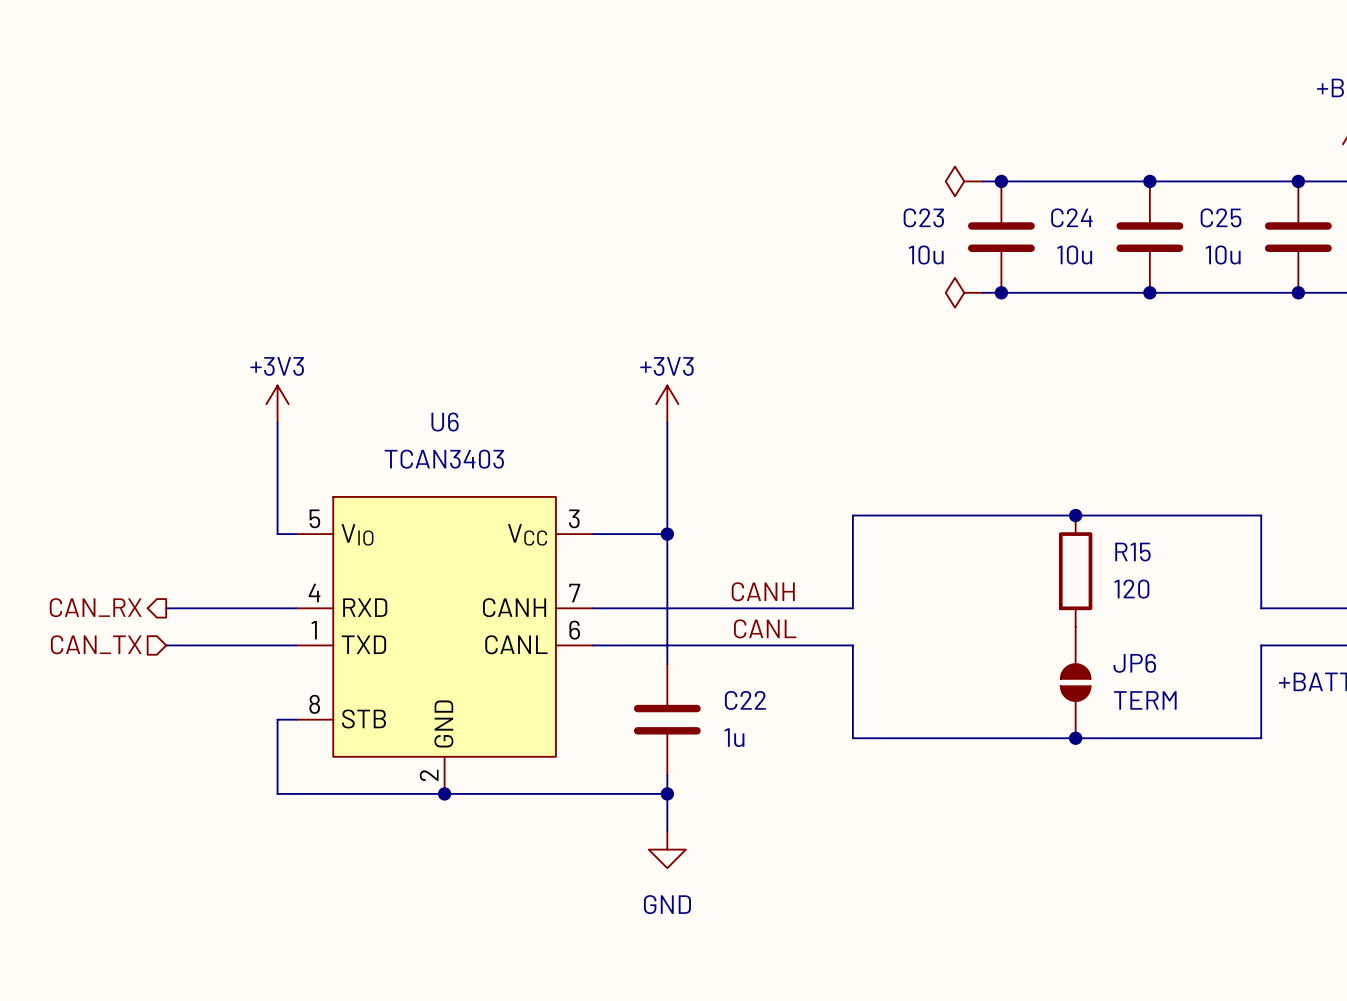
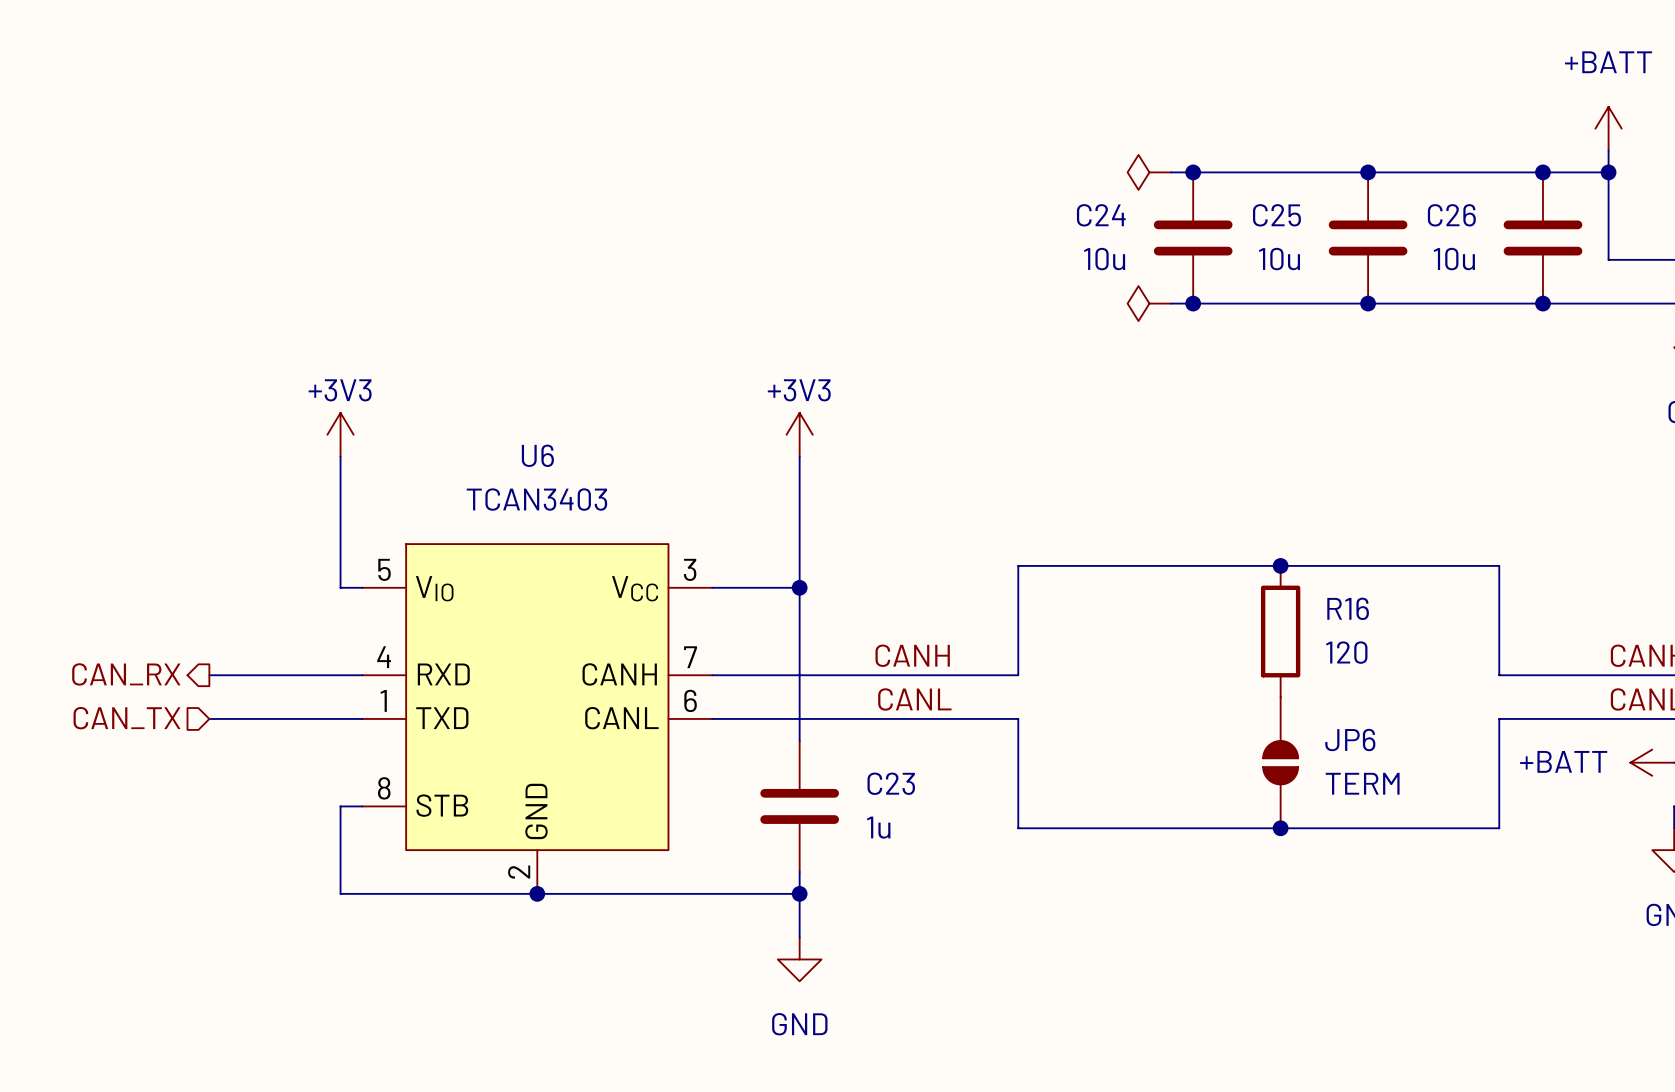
C23 name: C23 (923, 217) -> C24 (1101, 215)
C24 name: C24 (1071, 217) -> C25 (1276, 215)
C25 name: C25 (1221, 217) -> C26 (1451, 215)
R15 name: R15 (1132, 552) -> R16 (1348, 608)
C22 name: C22 (745, 700) -> C23 (891, 783)

